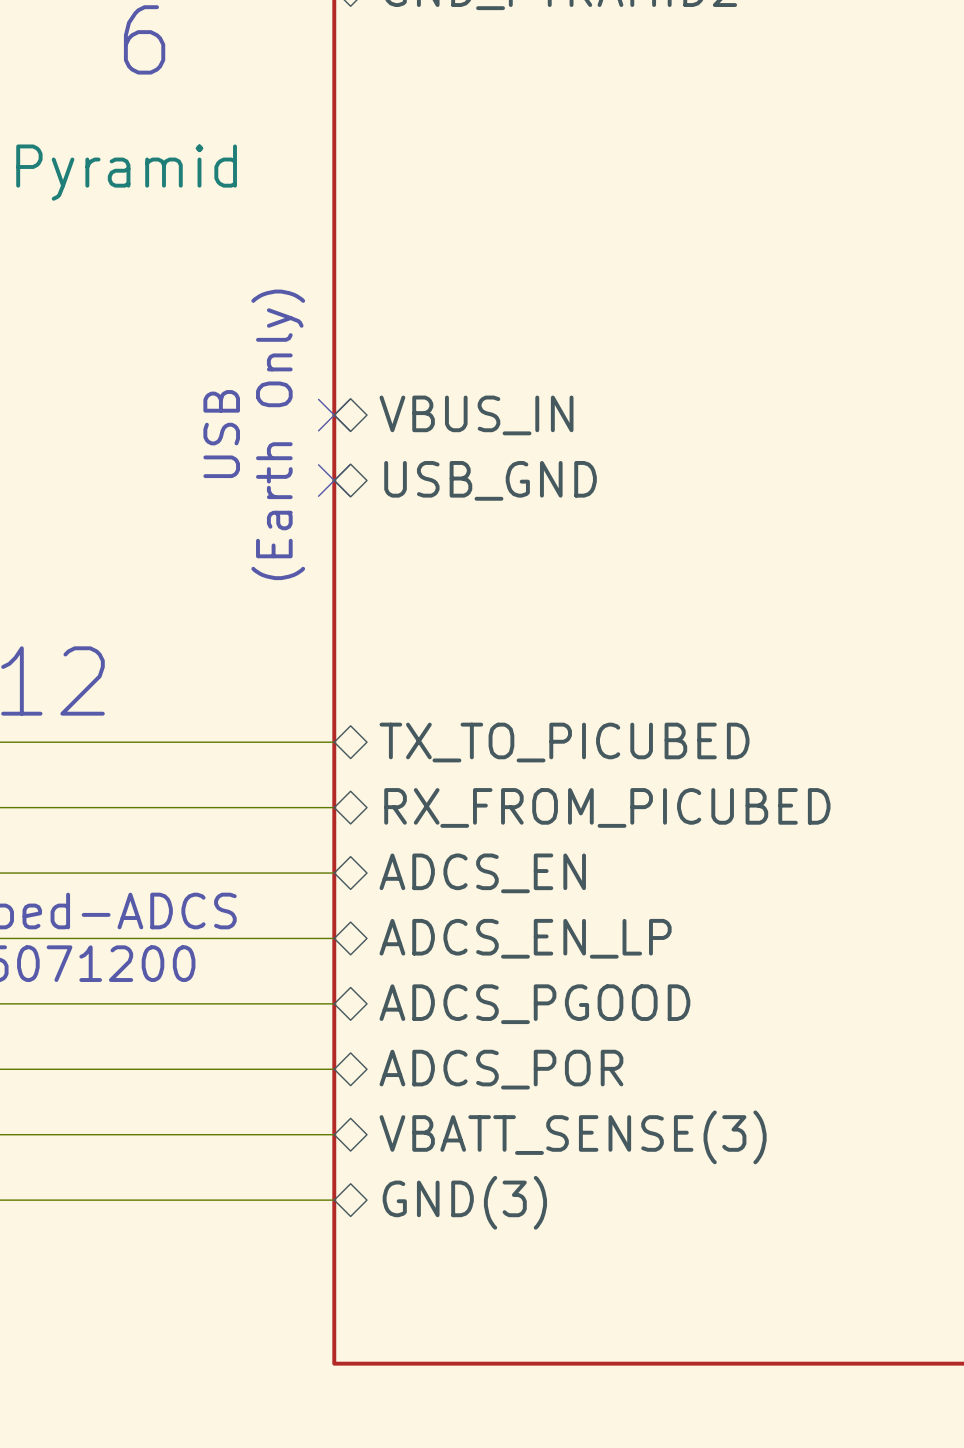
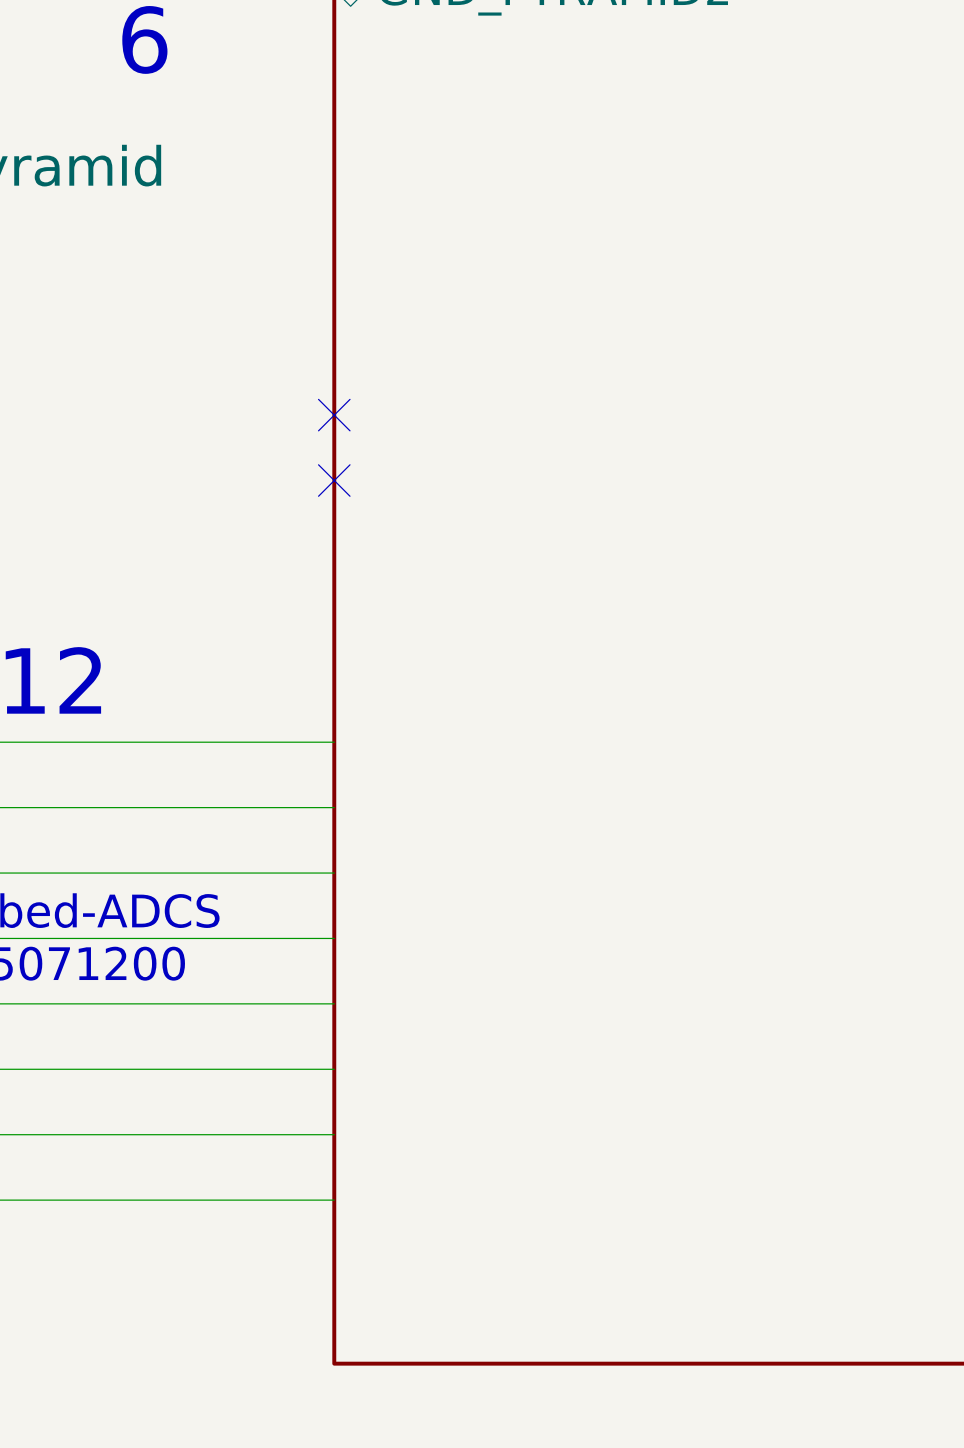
sheet pin: VBUS_IN (476, 415) -> none
text: USB (221, 434) -> none
text: (Earth Only) (278, 434) -> none
sheet pin: USB_GND (490, 480) -> none
sheet pin: TX_TO_PICUBED (564, 742) -> none
sheet pin: RX_FROM_PICUBED (607, 807) -> none
sheet pin: ADCS_EN (482, 873) -> none
sheet pin: ADCS_EN_LP (525, 938) -> none
sheet pin: ADCS_PGOOD (534, 1004) -> none
sheet pin: ADCS_POR (501, 1069) -> none
sheet pin: VBATT_SENSE(3) (573, 1137) -> none
sheet pin: GND(3) (464, 1202) -> none

